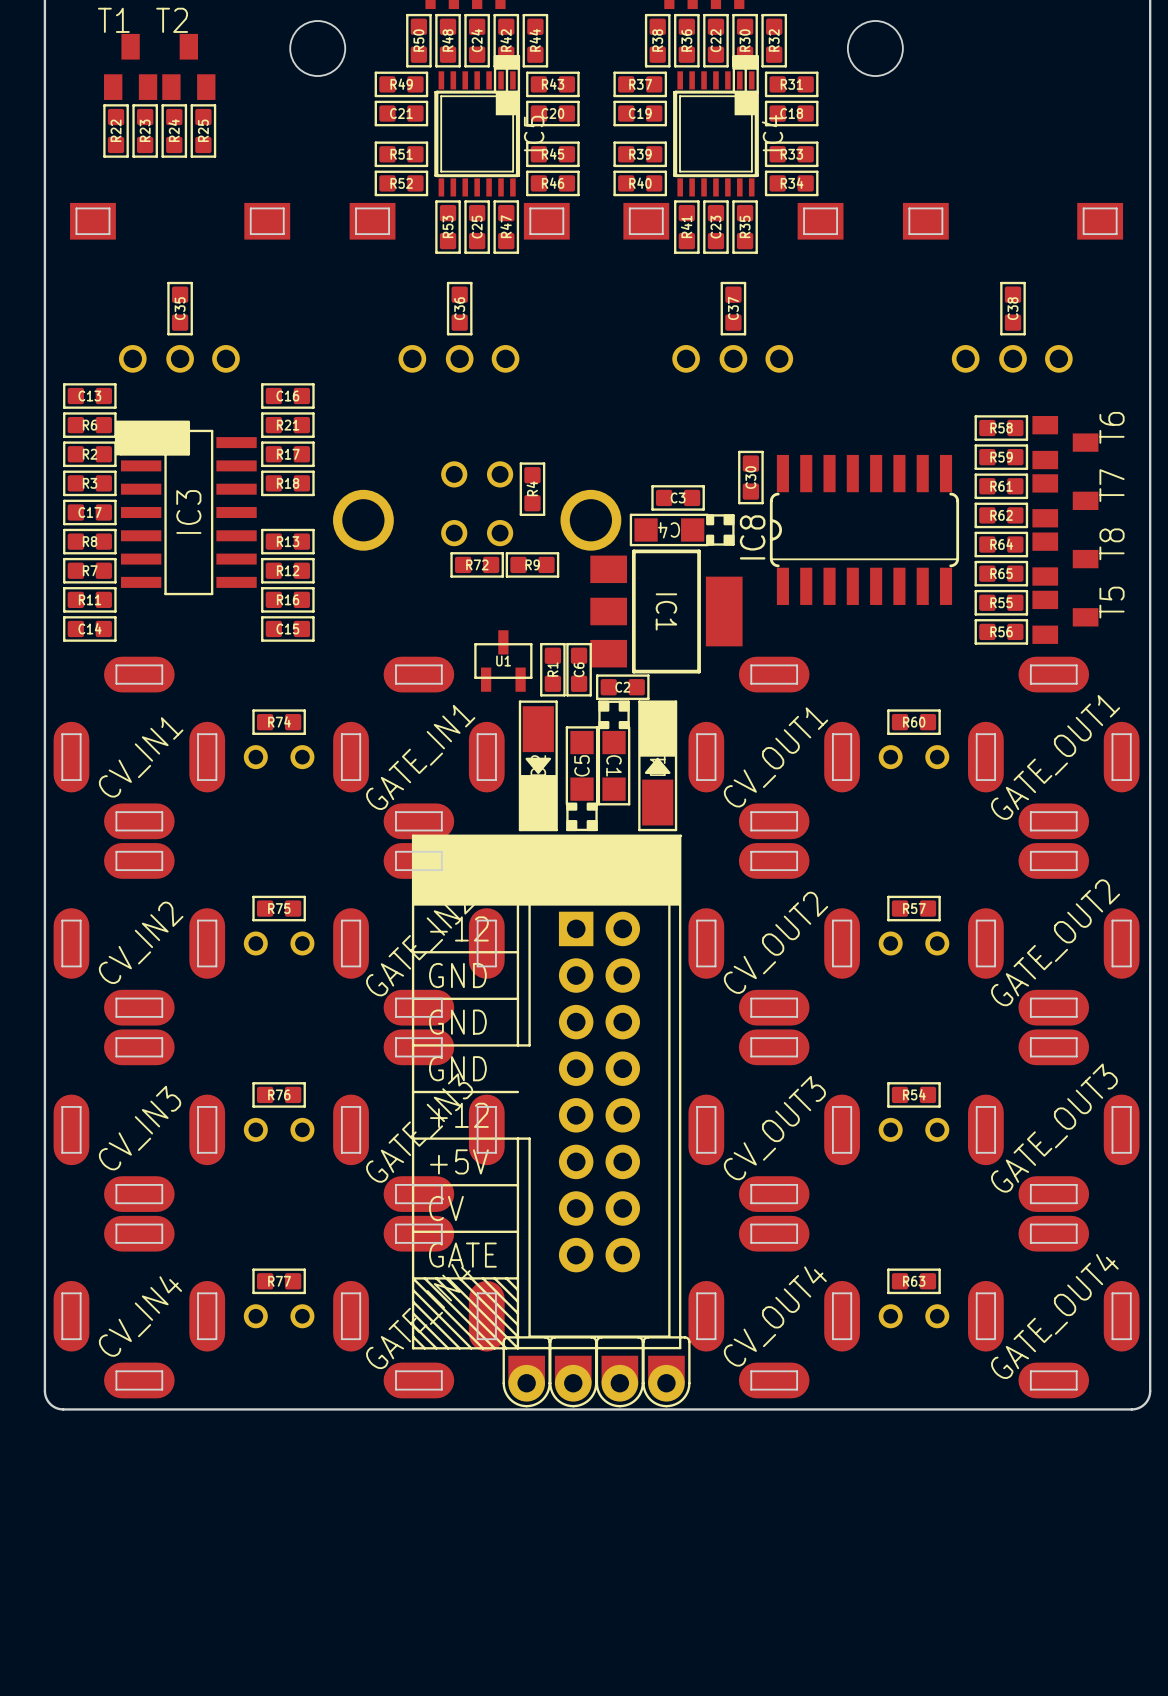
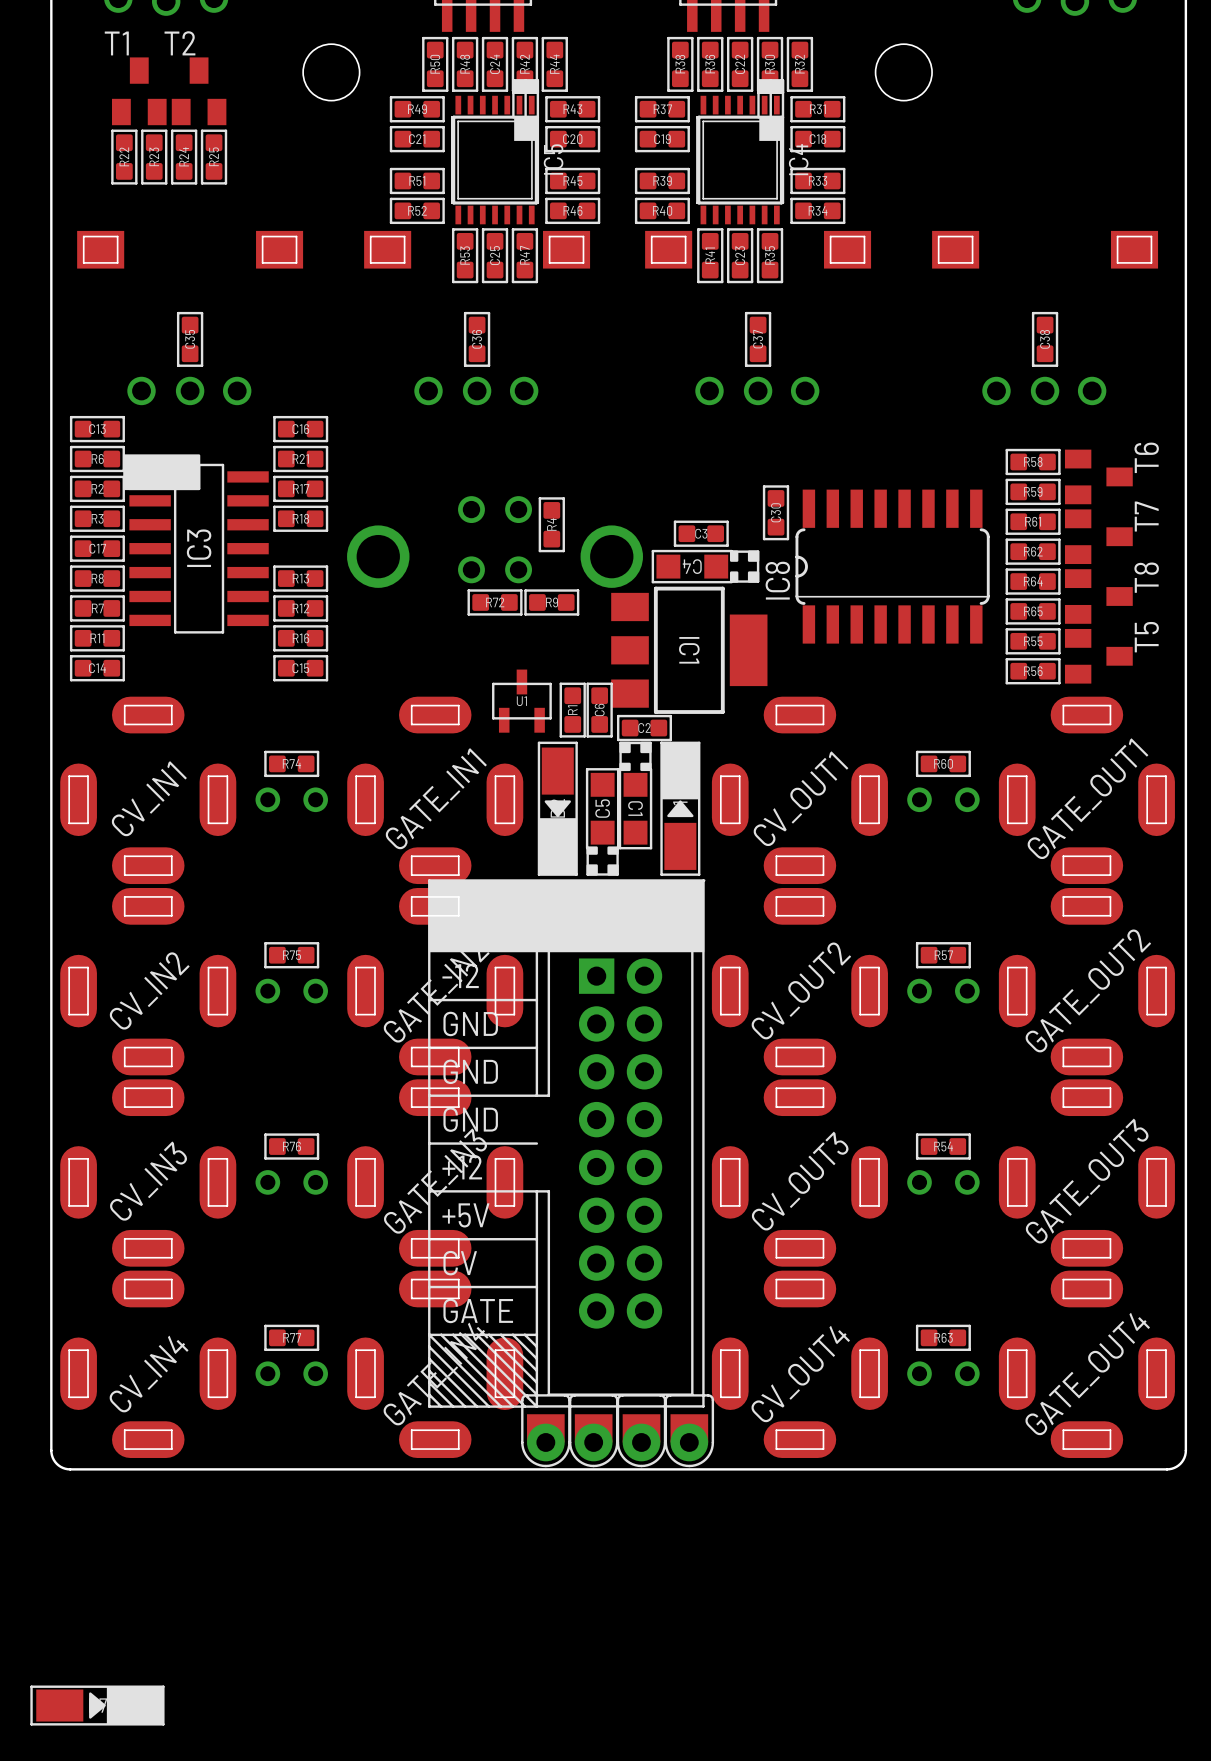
part: none -> (97, 1705)

